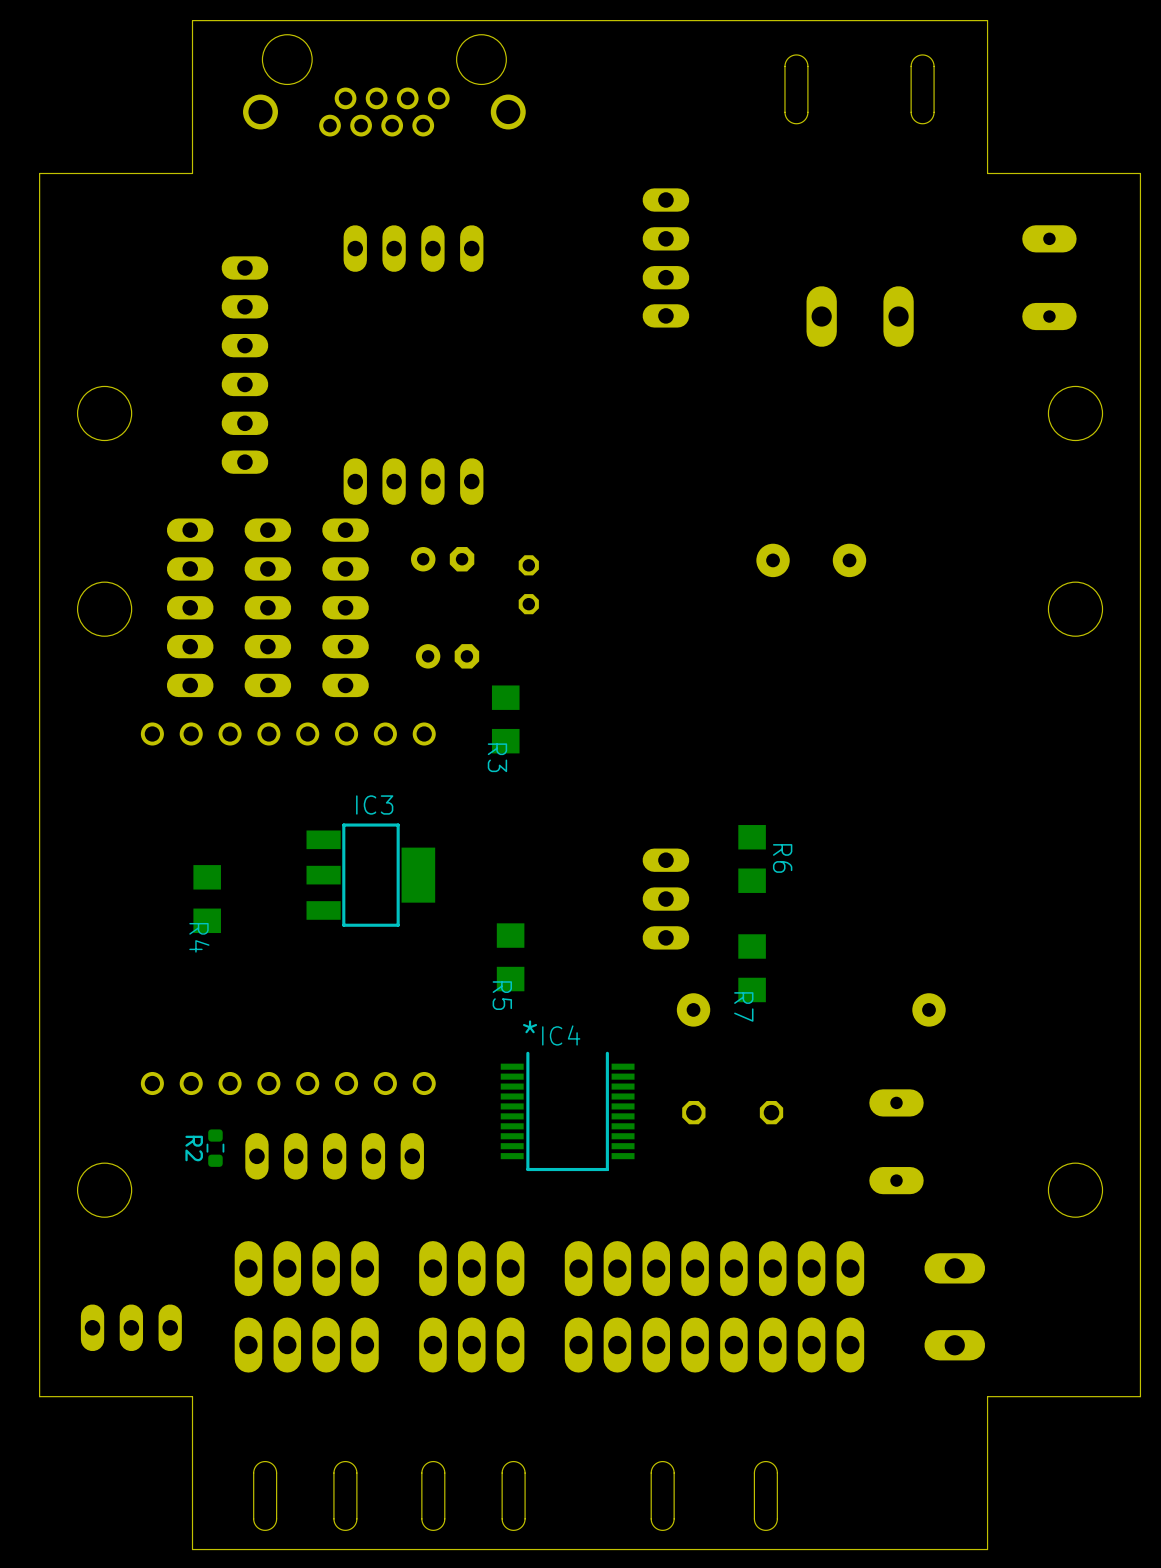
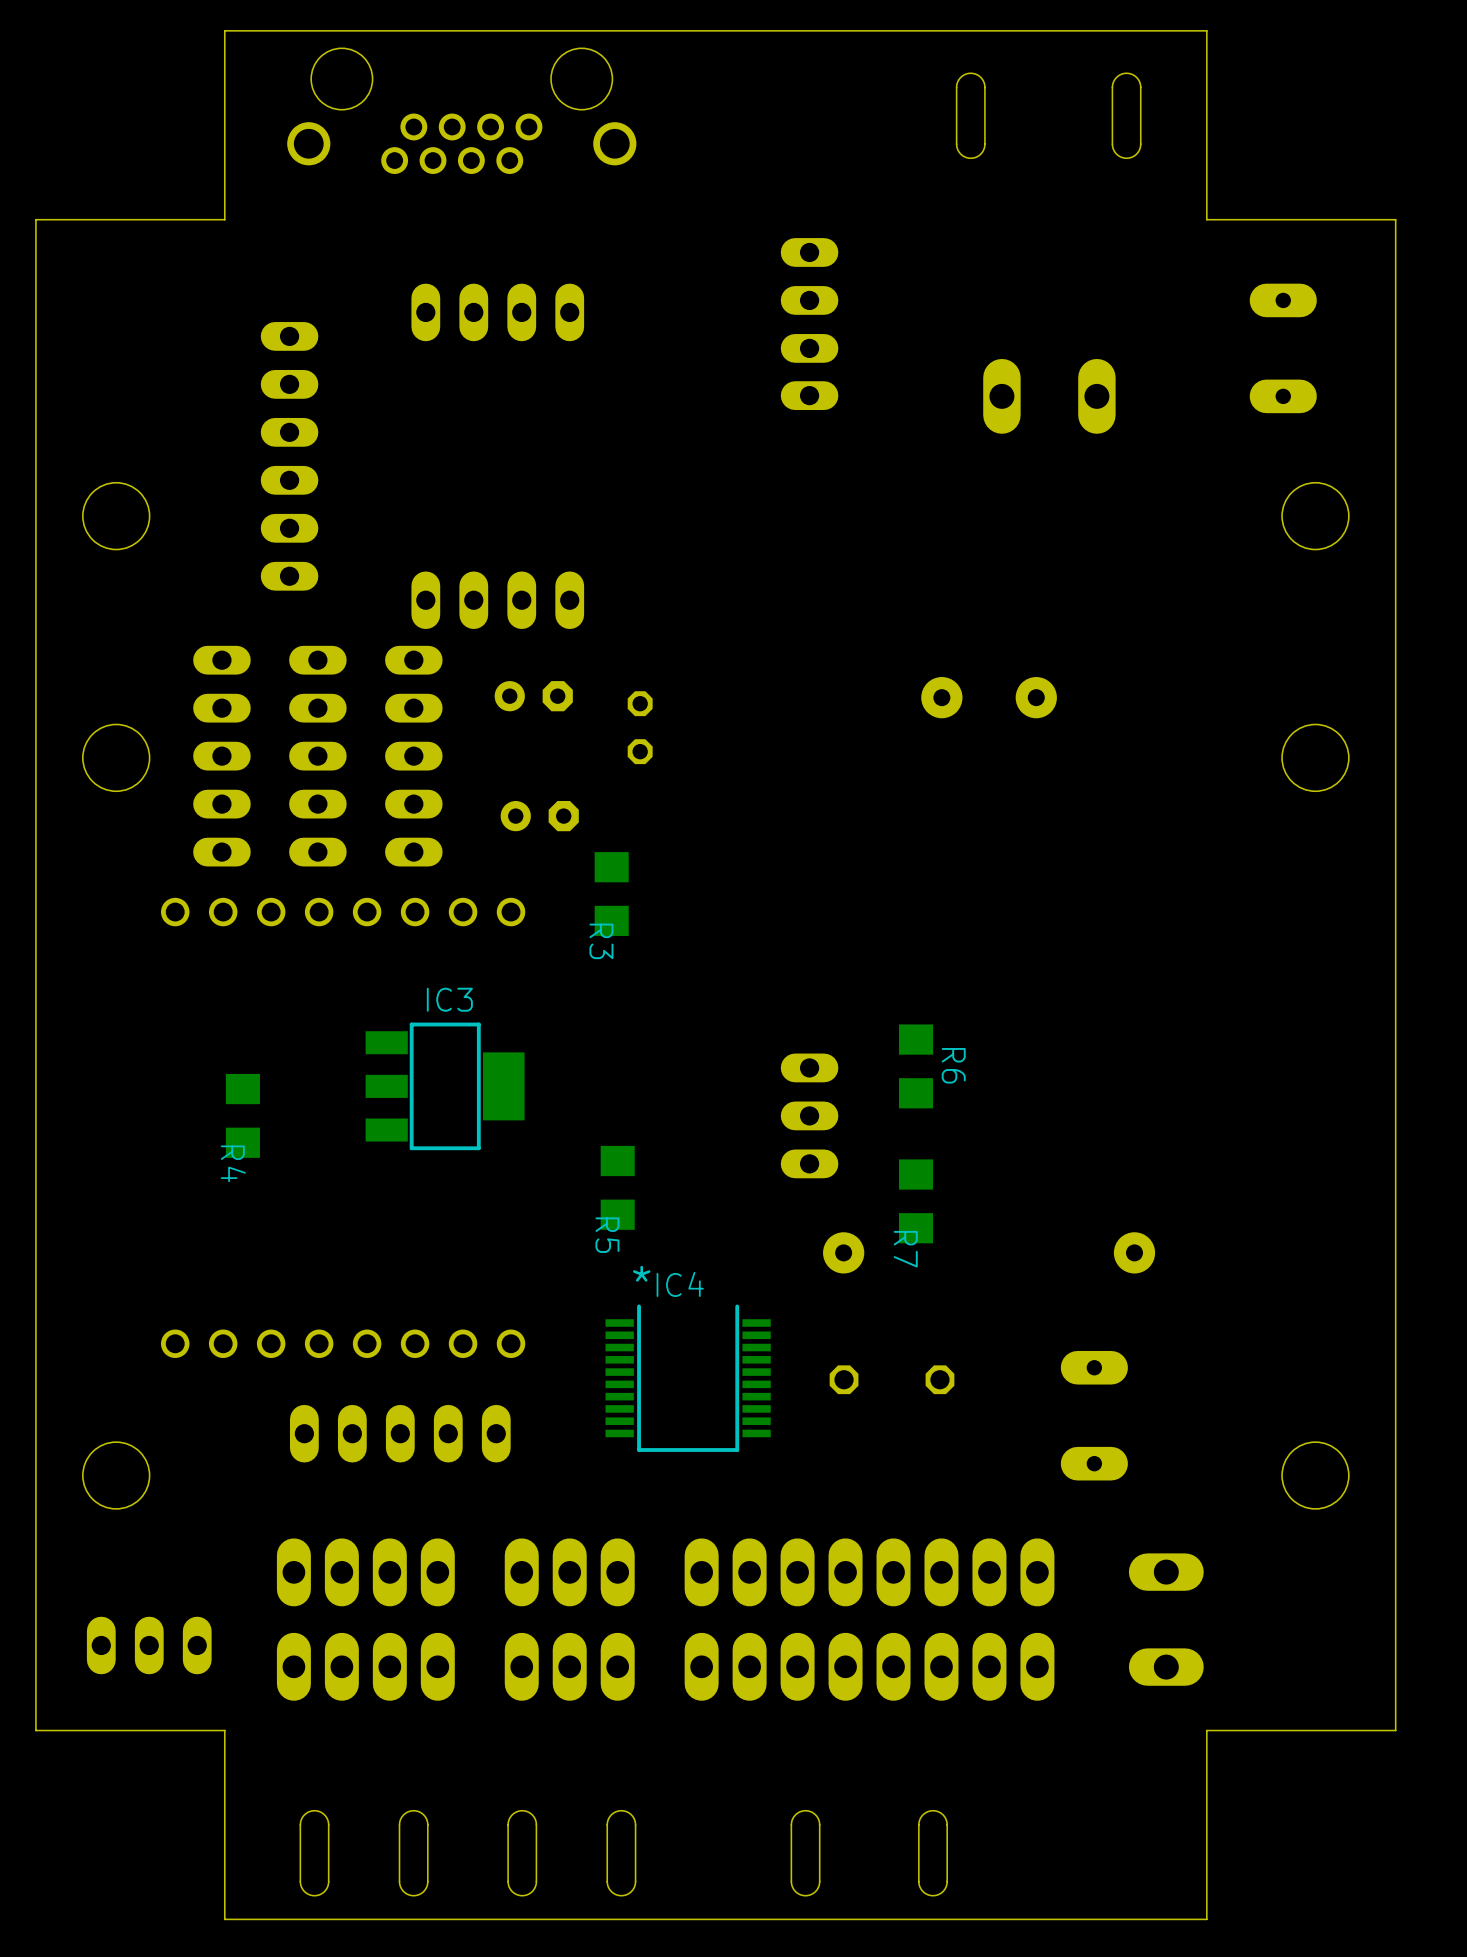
R2: (215, 1148) -> none

